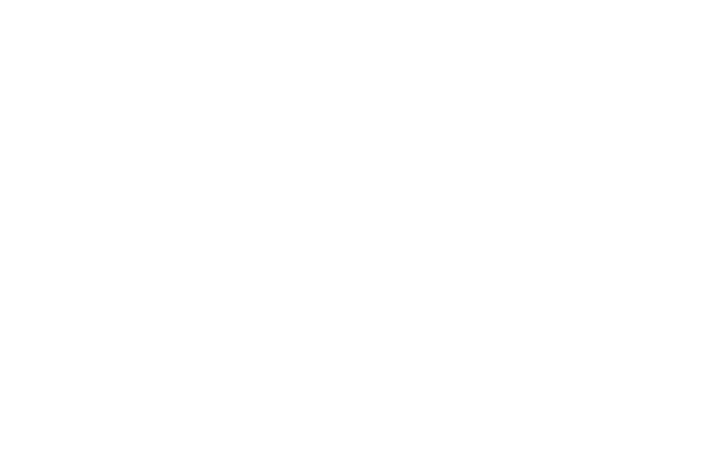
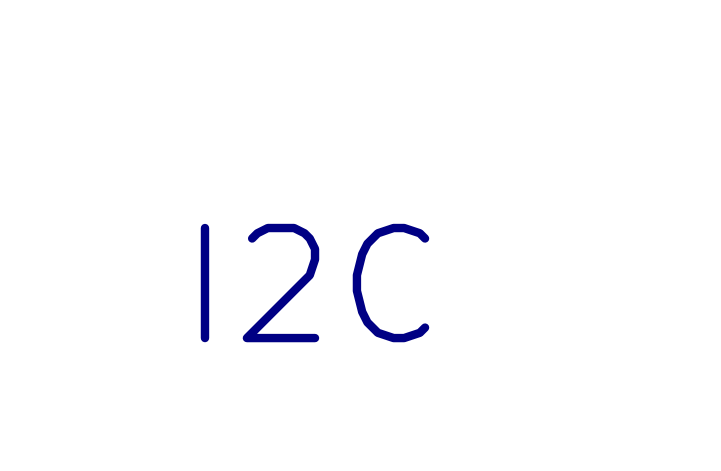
text: none -> I2C (315, 283)

